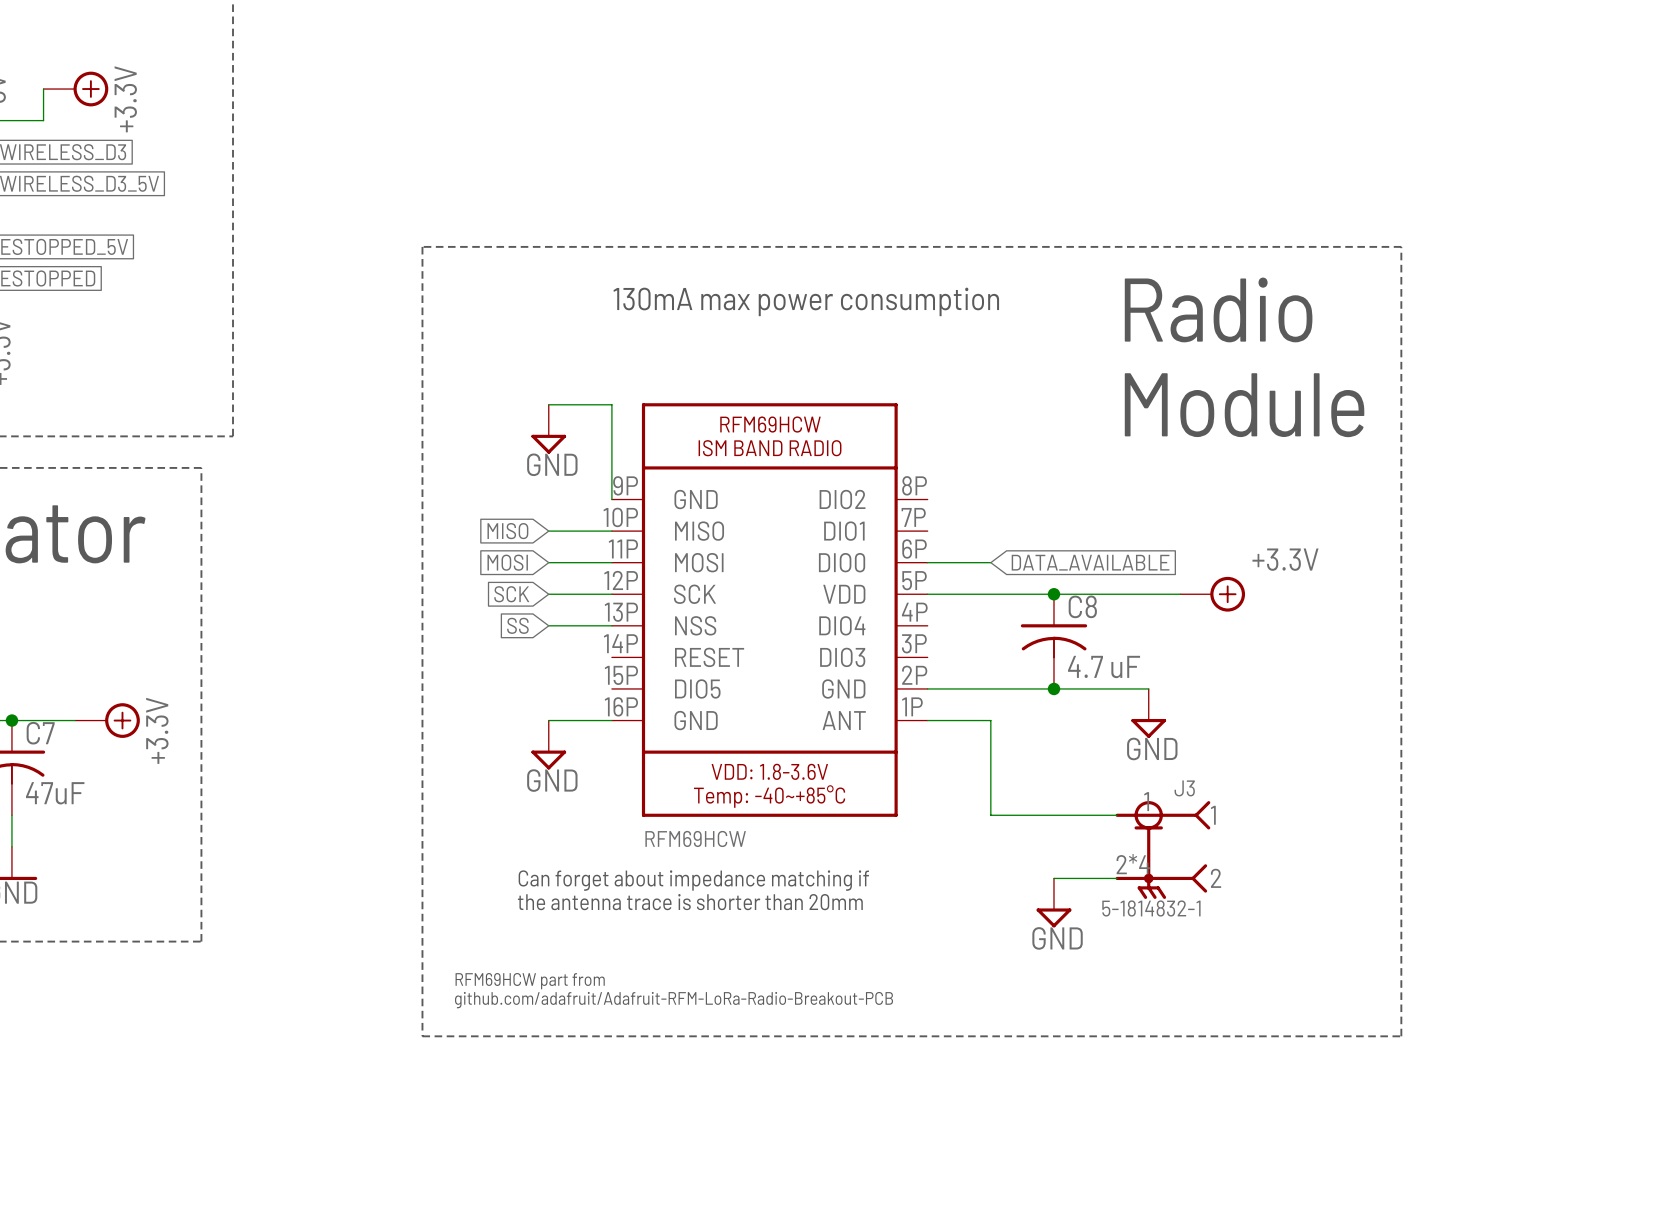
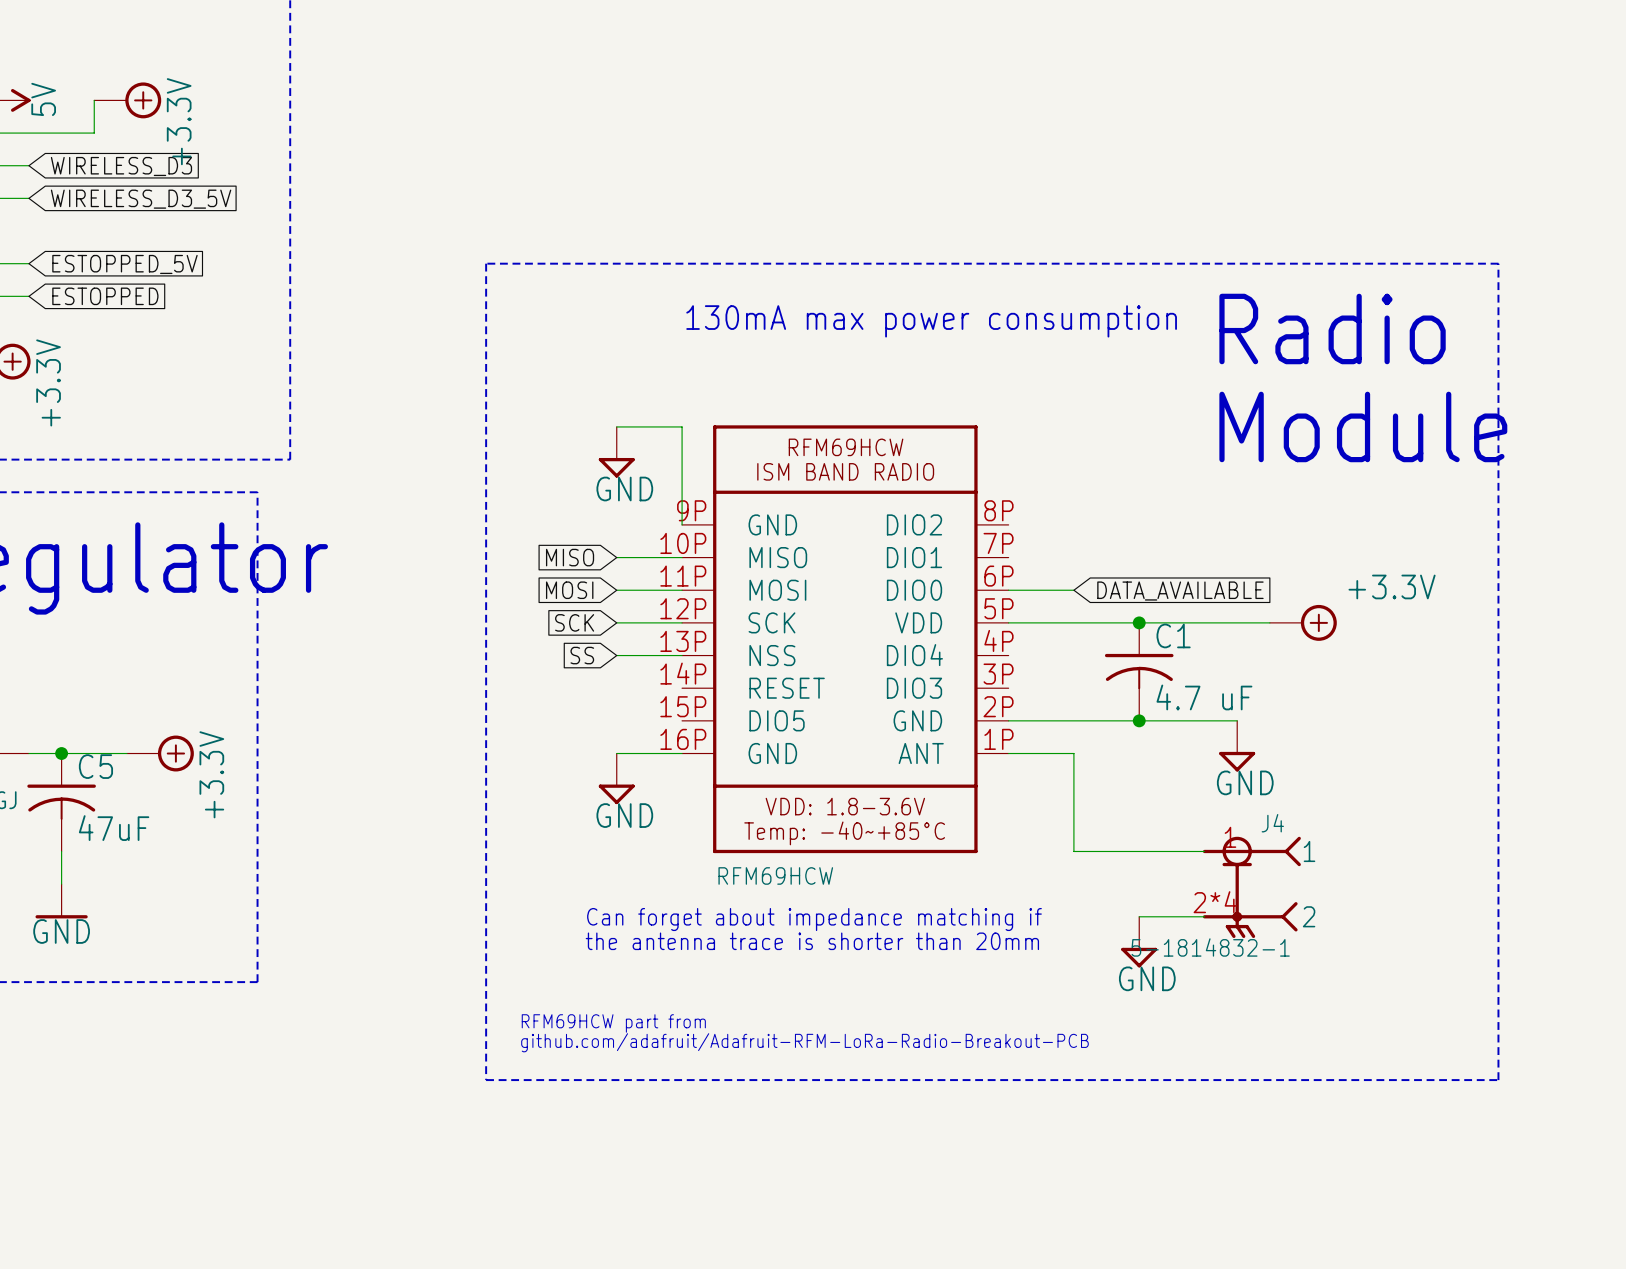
C8 name: C8 (1082, 606) -> C1 (1173, 635)
C7 name: C7 (40, 733) -> C5 (95, 766)
J3 name: J3 (1184, 788) -> J4 (1272, 823)

